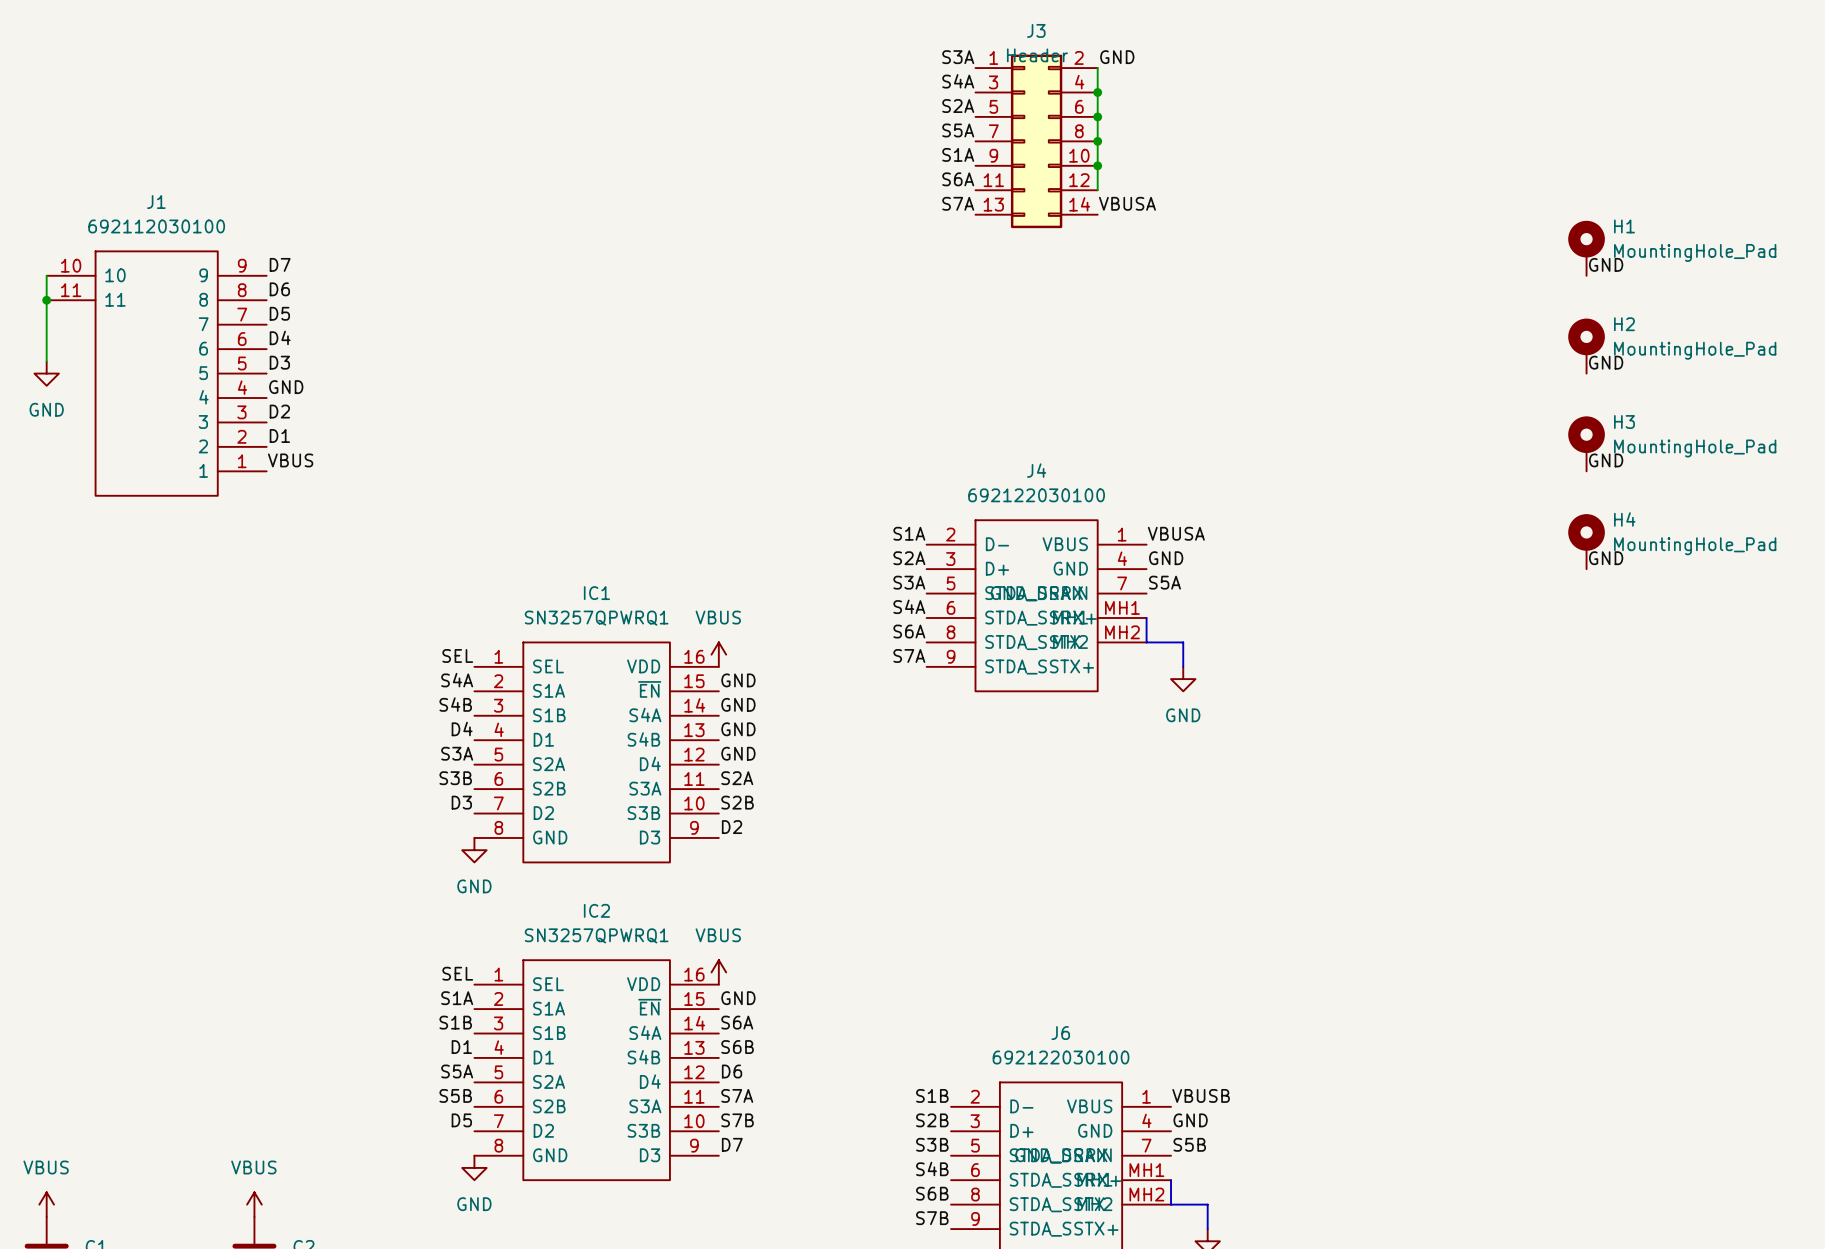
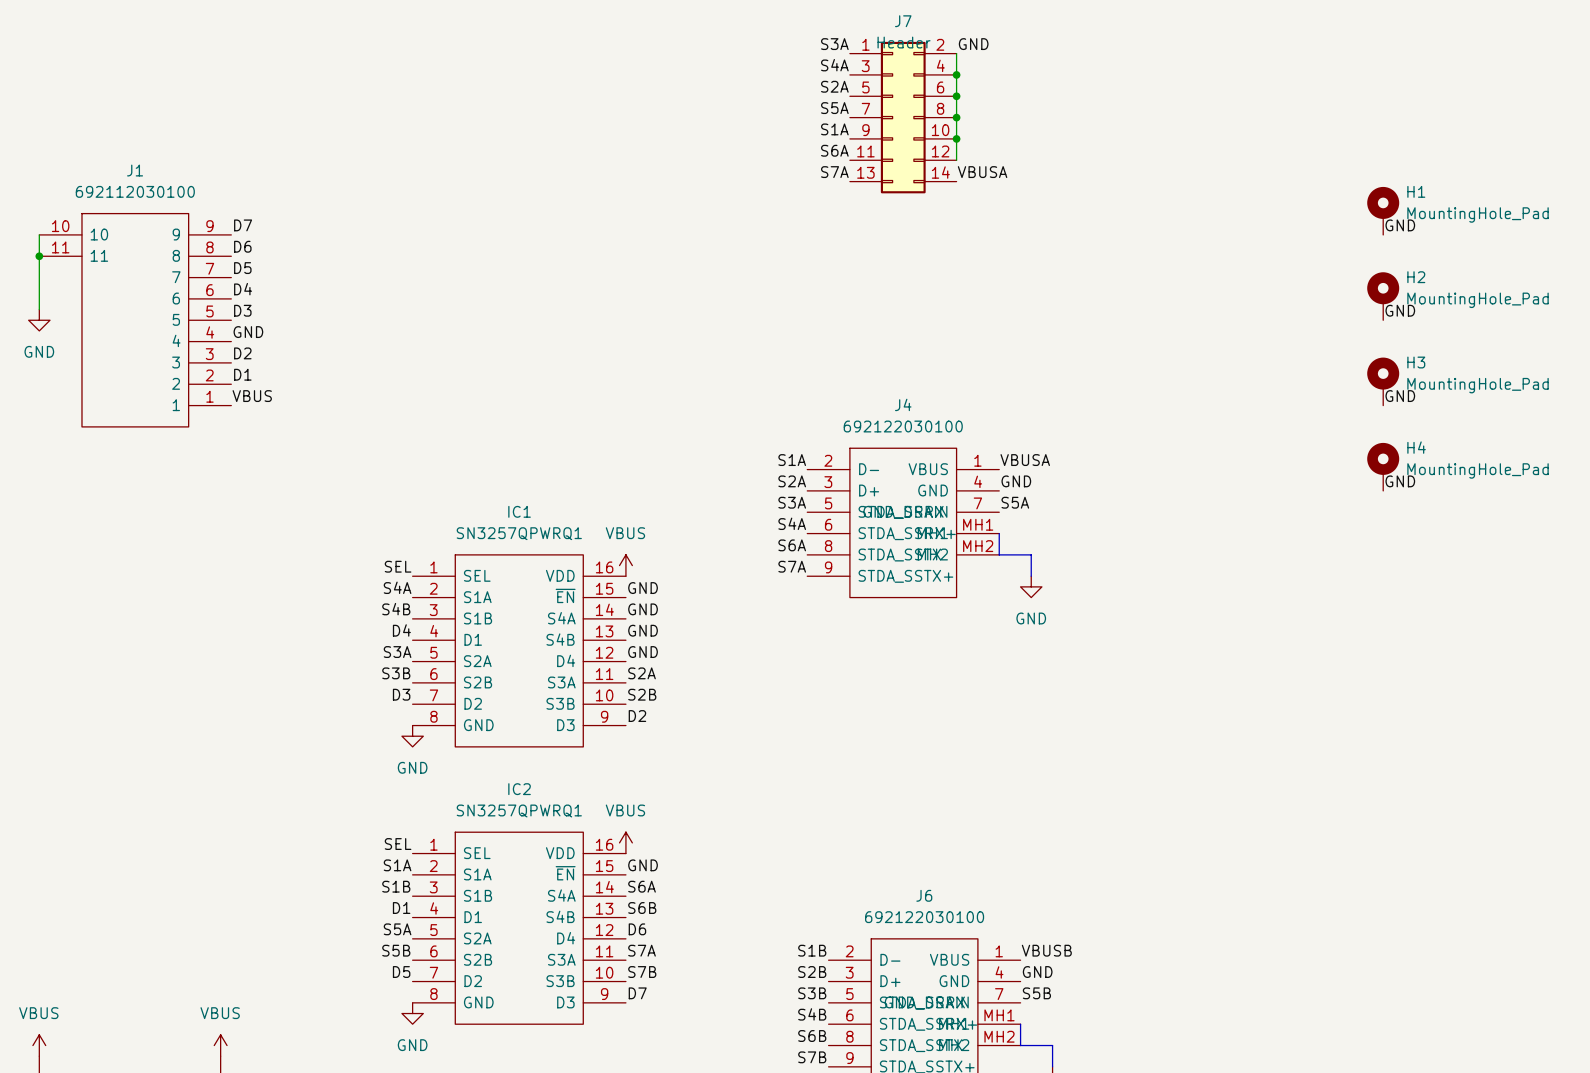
J3 name: J3 (1036, 30) -> J7 (903, 21)

